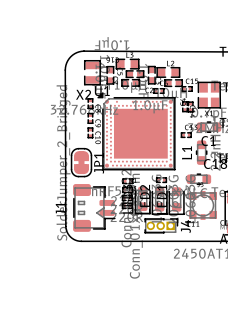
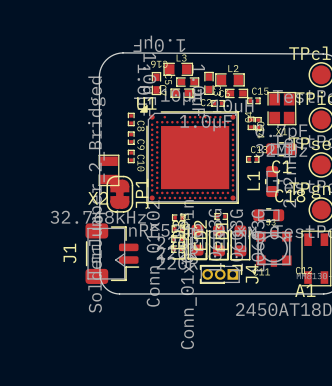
X2 position: (92, 72) -> (108, 170)
J1 position: (94, 207) -> (112, 253)

